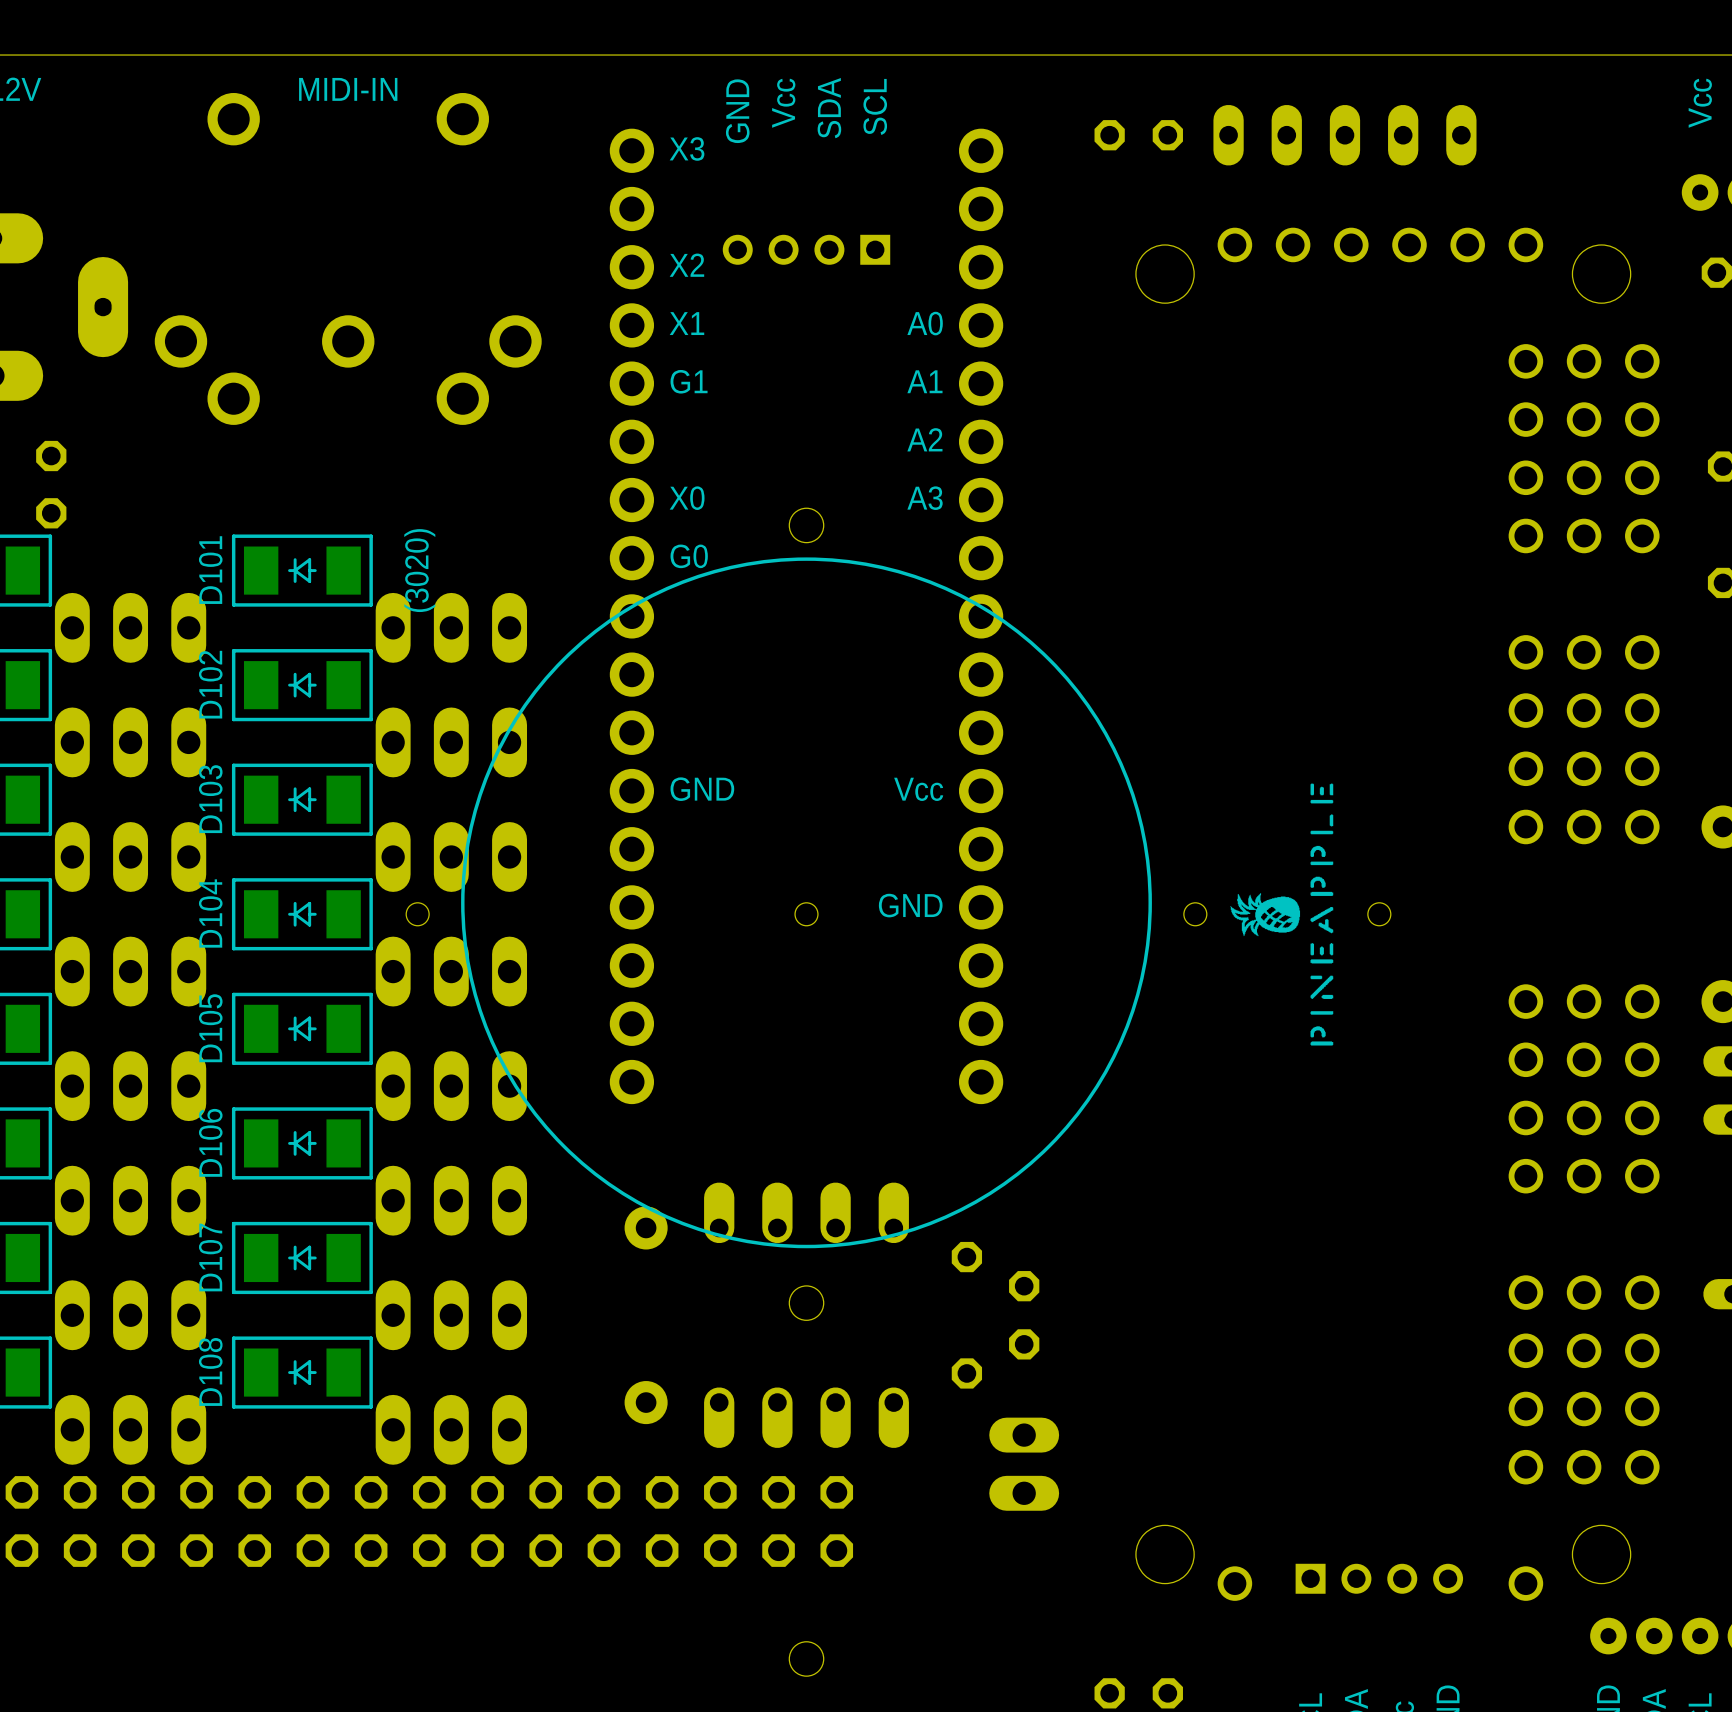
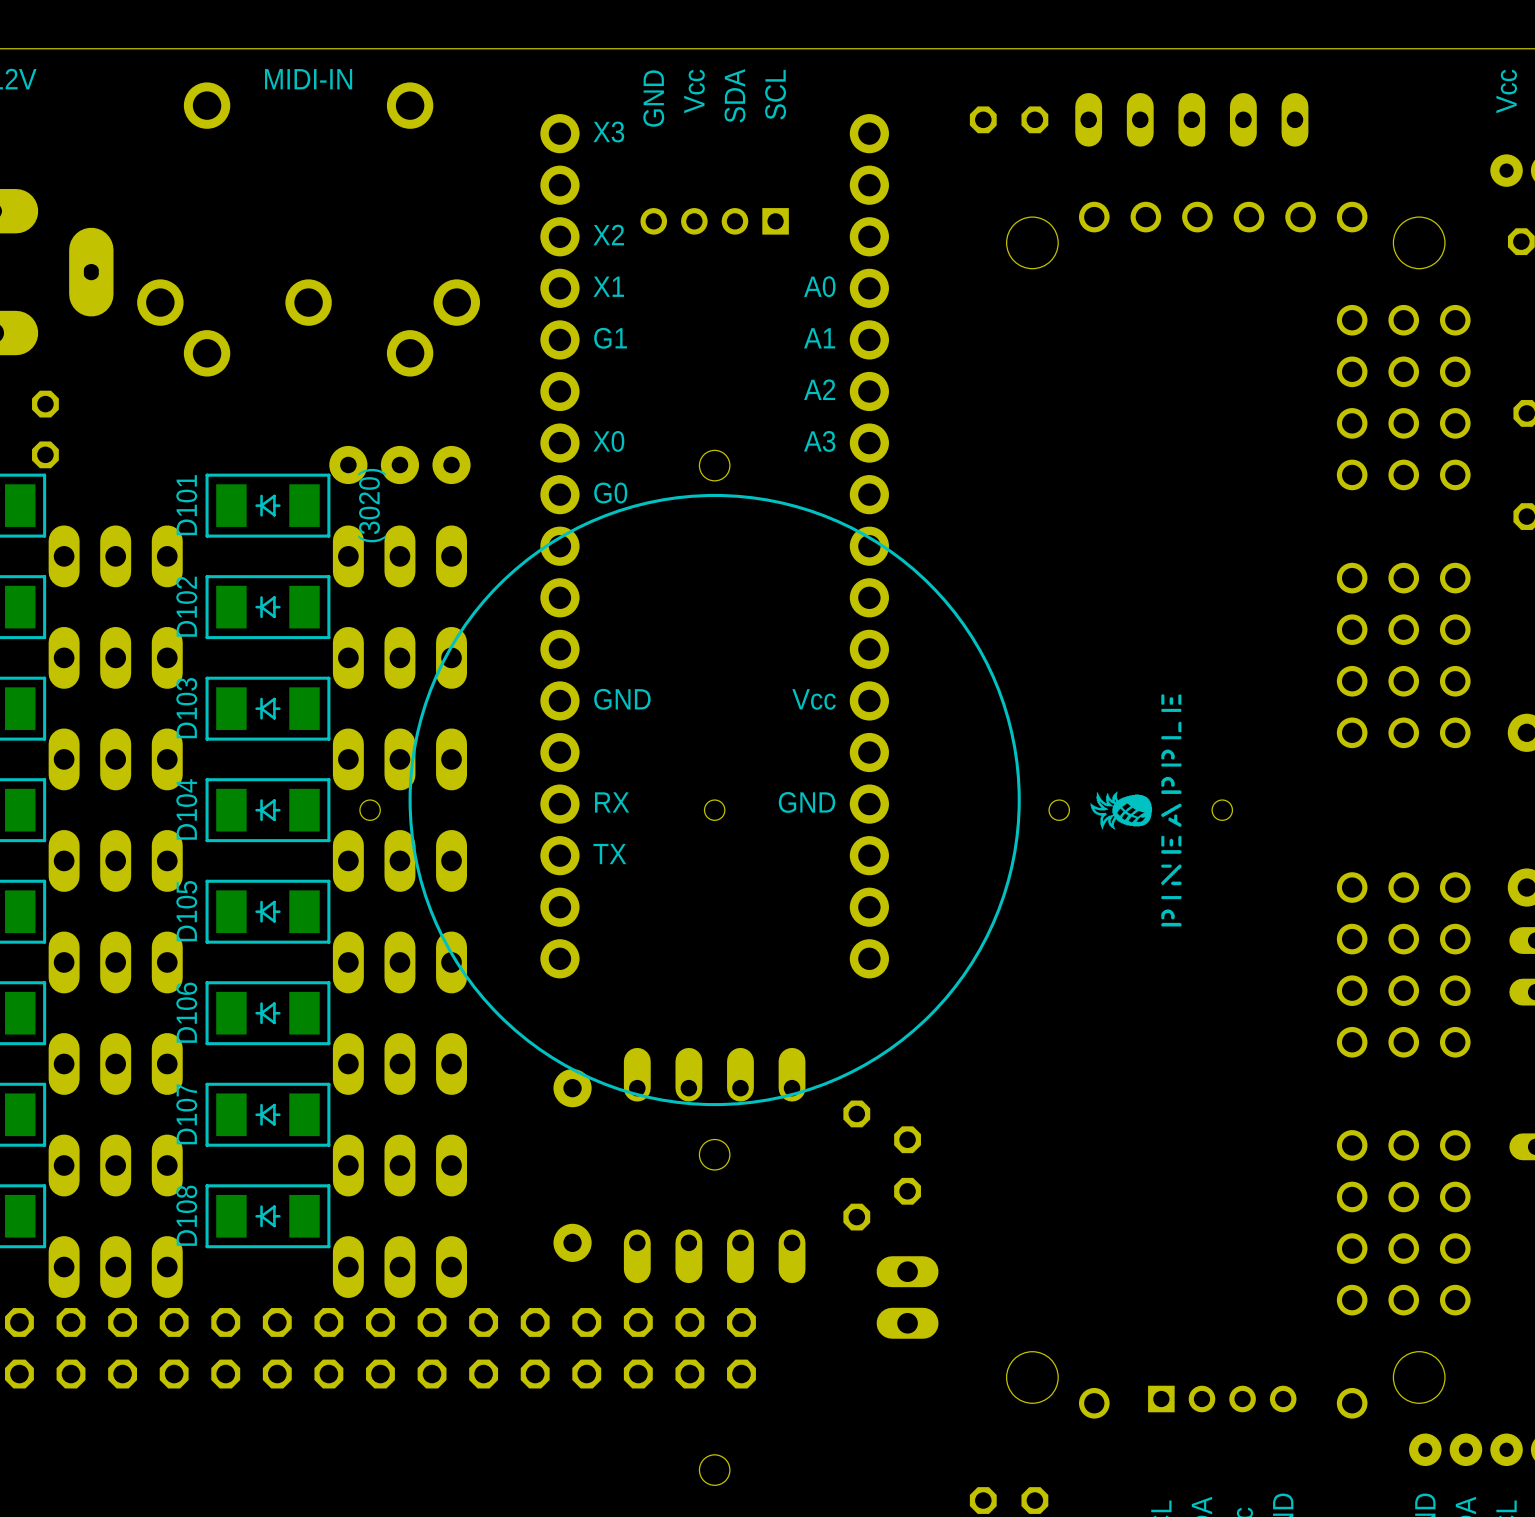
part: none -> (399, 465)
text: none -> RX (612, 802)
text: none -> TX (609, 854)

